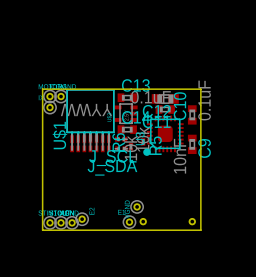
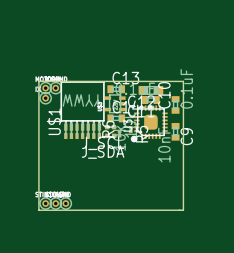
part: (137, 206) -> none
part: (82, 219) -> none
part: (143, 221) -> none
part: (192, 221) -> none
part: (129, 222) -> none

